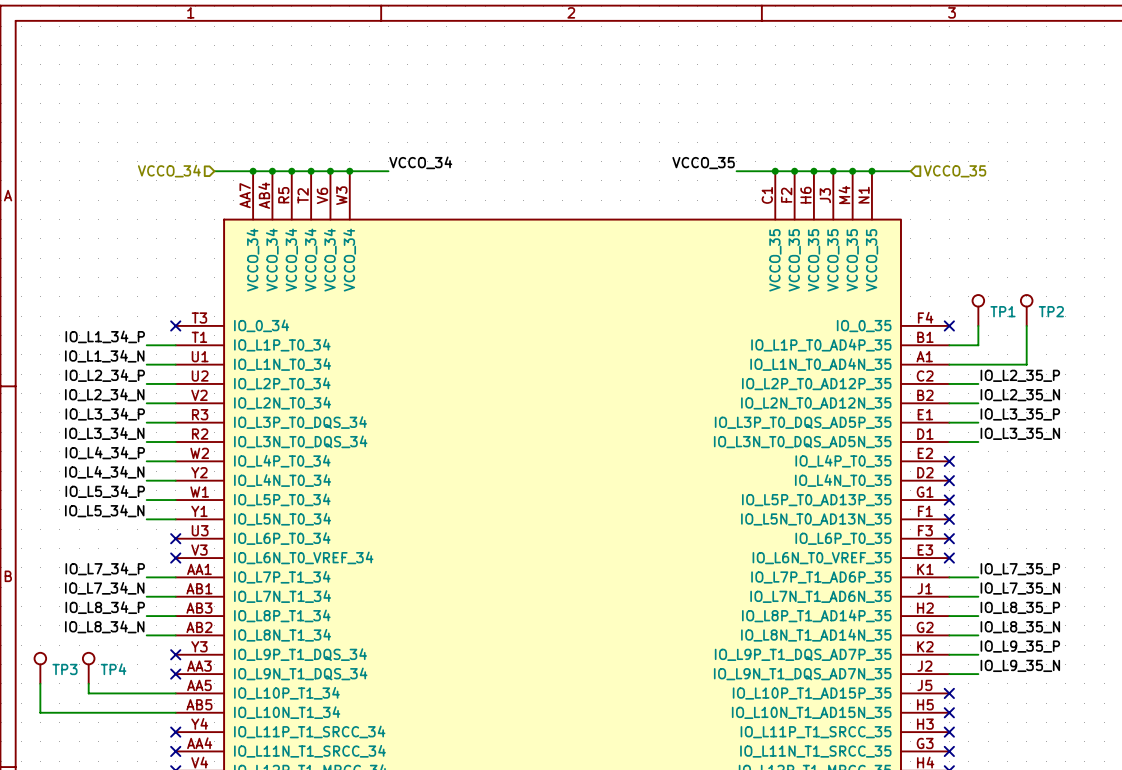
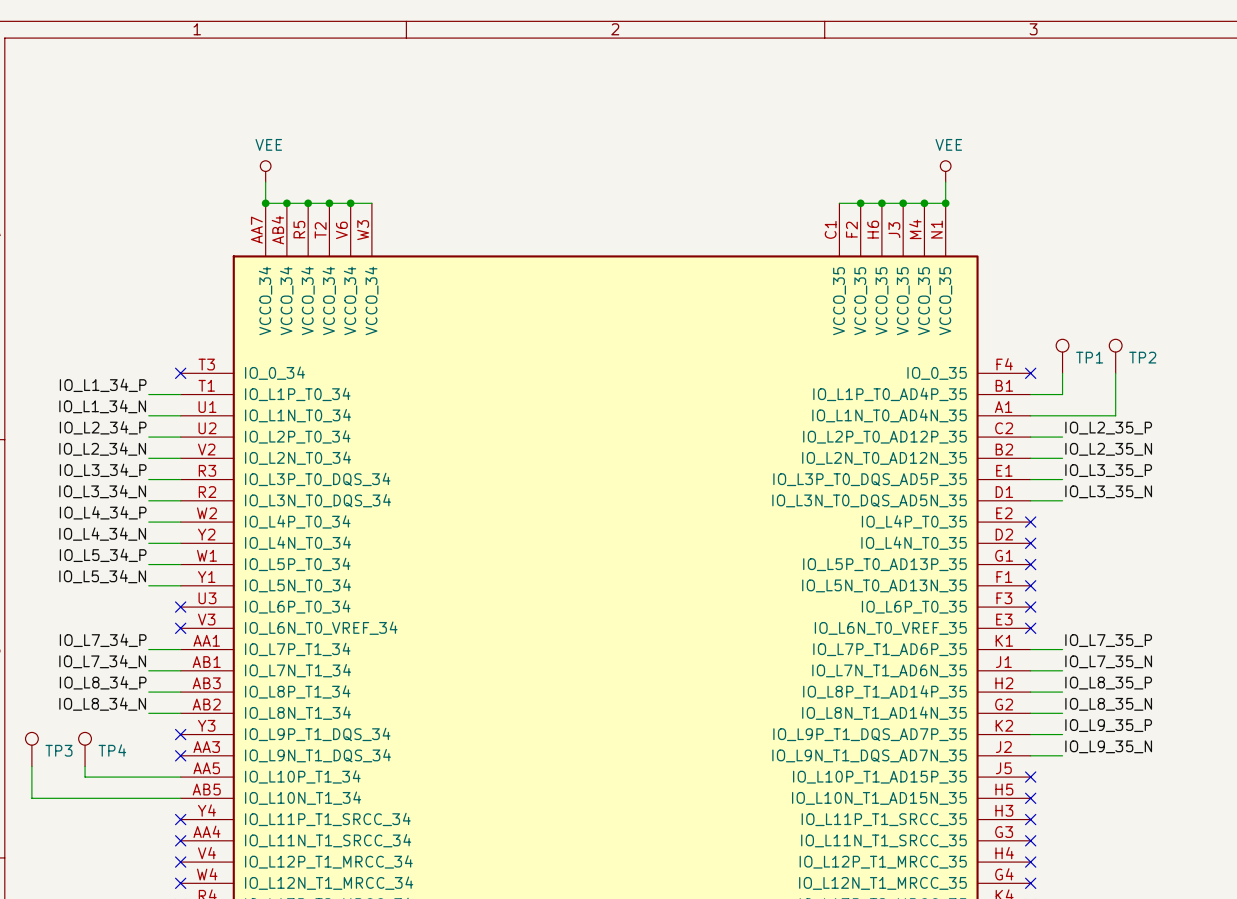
power symbol: none -> VEE (265, 171)
power symbol: none -> VEE (945, 171)
label: VCCO_34 (420, 162) -> none
label: VCCO_35 (703, 163) -> none
hierarchical label: VCCO_34 (169, 171) -> none
wire: (214, 171) (253, 171) -> (265, 182) (265, 203)
wire: (349, 171) (388, 171) -> none
junction: (349, 171) -> none
wire: (736, 171) (775, 171) -> none
junction: (775, 171) -> none
wire: (871, 171) (910, 171) -> (945, 203) (945, 182)
hierarchical label: VCCO_35 (955, 171) -> none

